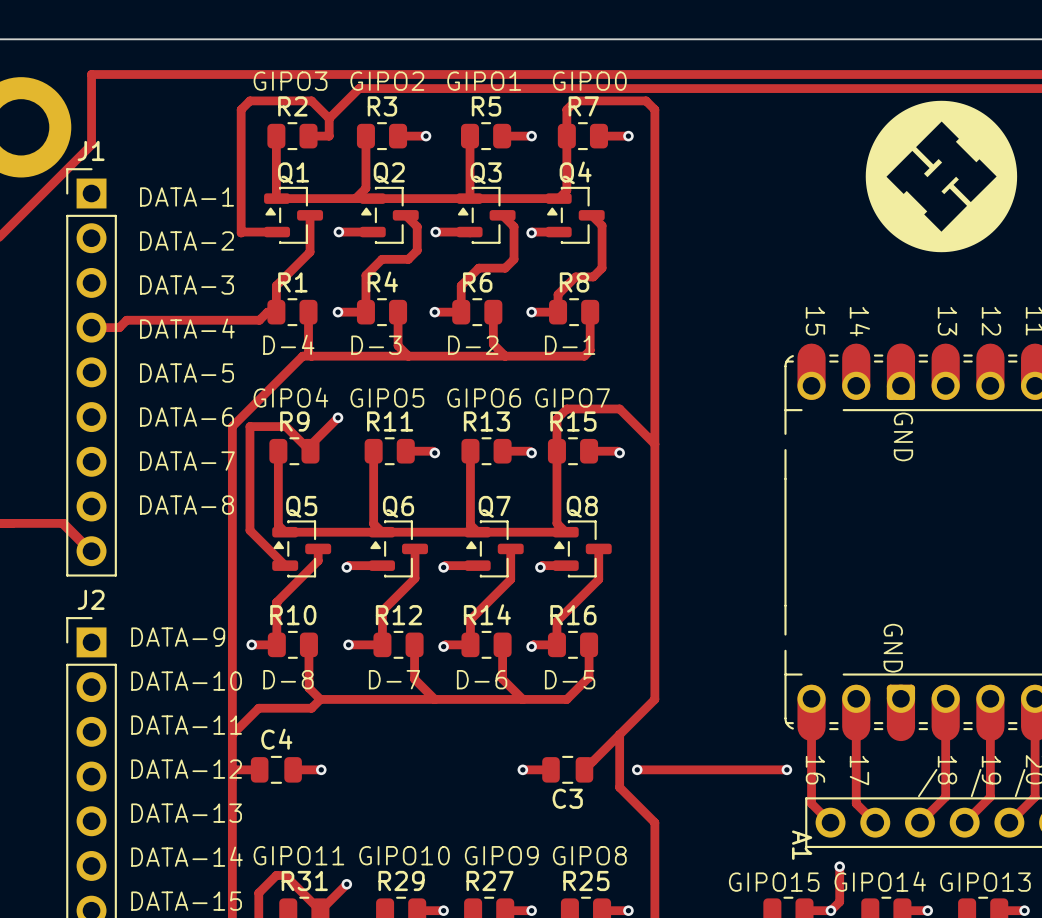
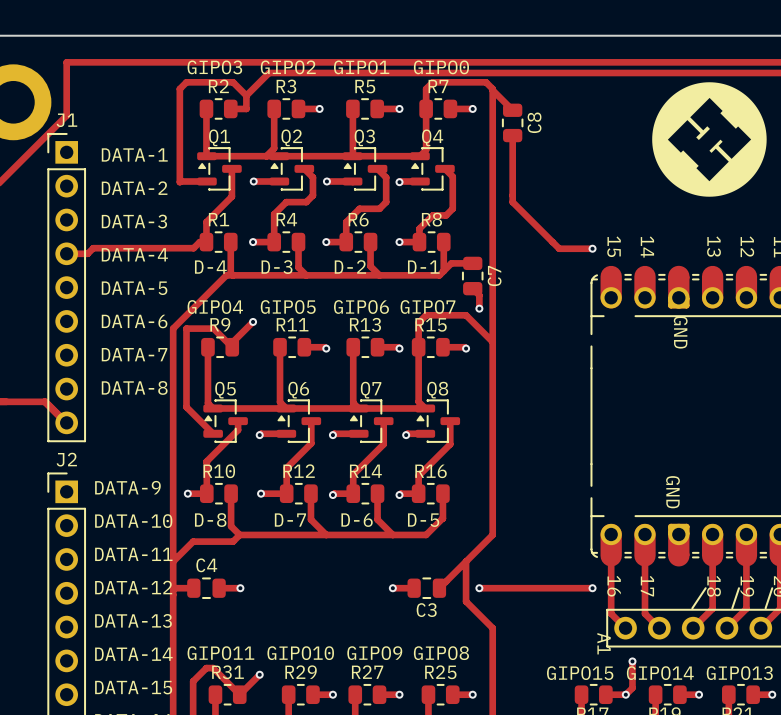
track: none -> (492, 90) (512, 110)
C8: none -> (512, 122)
track: none -> (512, 135) (512, 202) (559, 248) (592, 248)
via: none -> (592, 248)
track: none -> (472, 263) (451, 263) (443, 271)
C7: none -> (472, 276)
track: none -> (472, 288) (479, 295) (479, 308)
via: none -> (479, 308)

